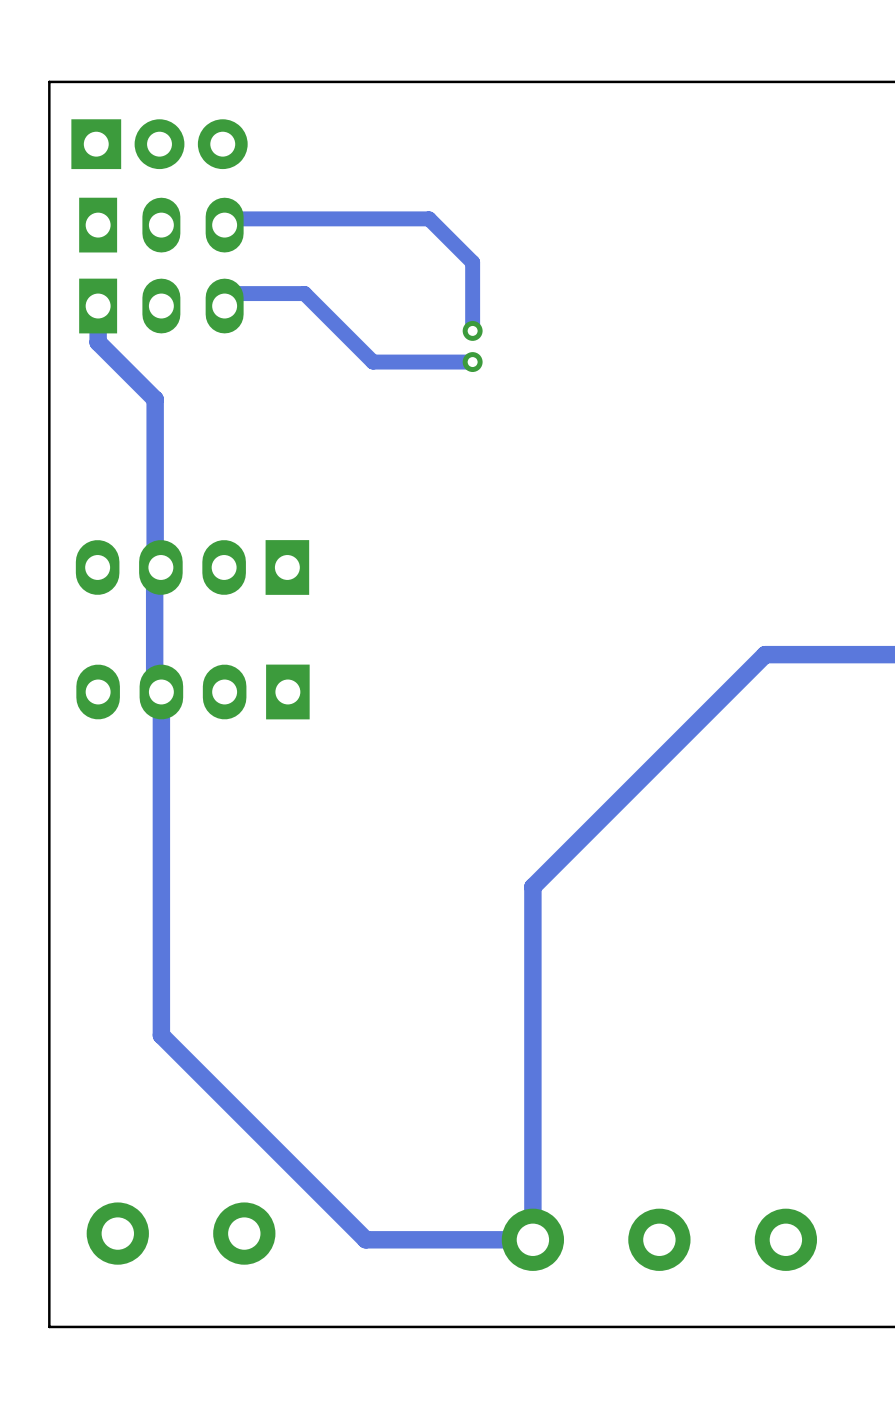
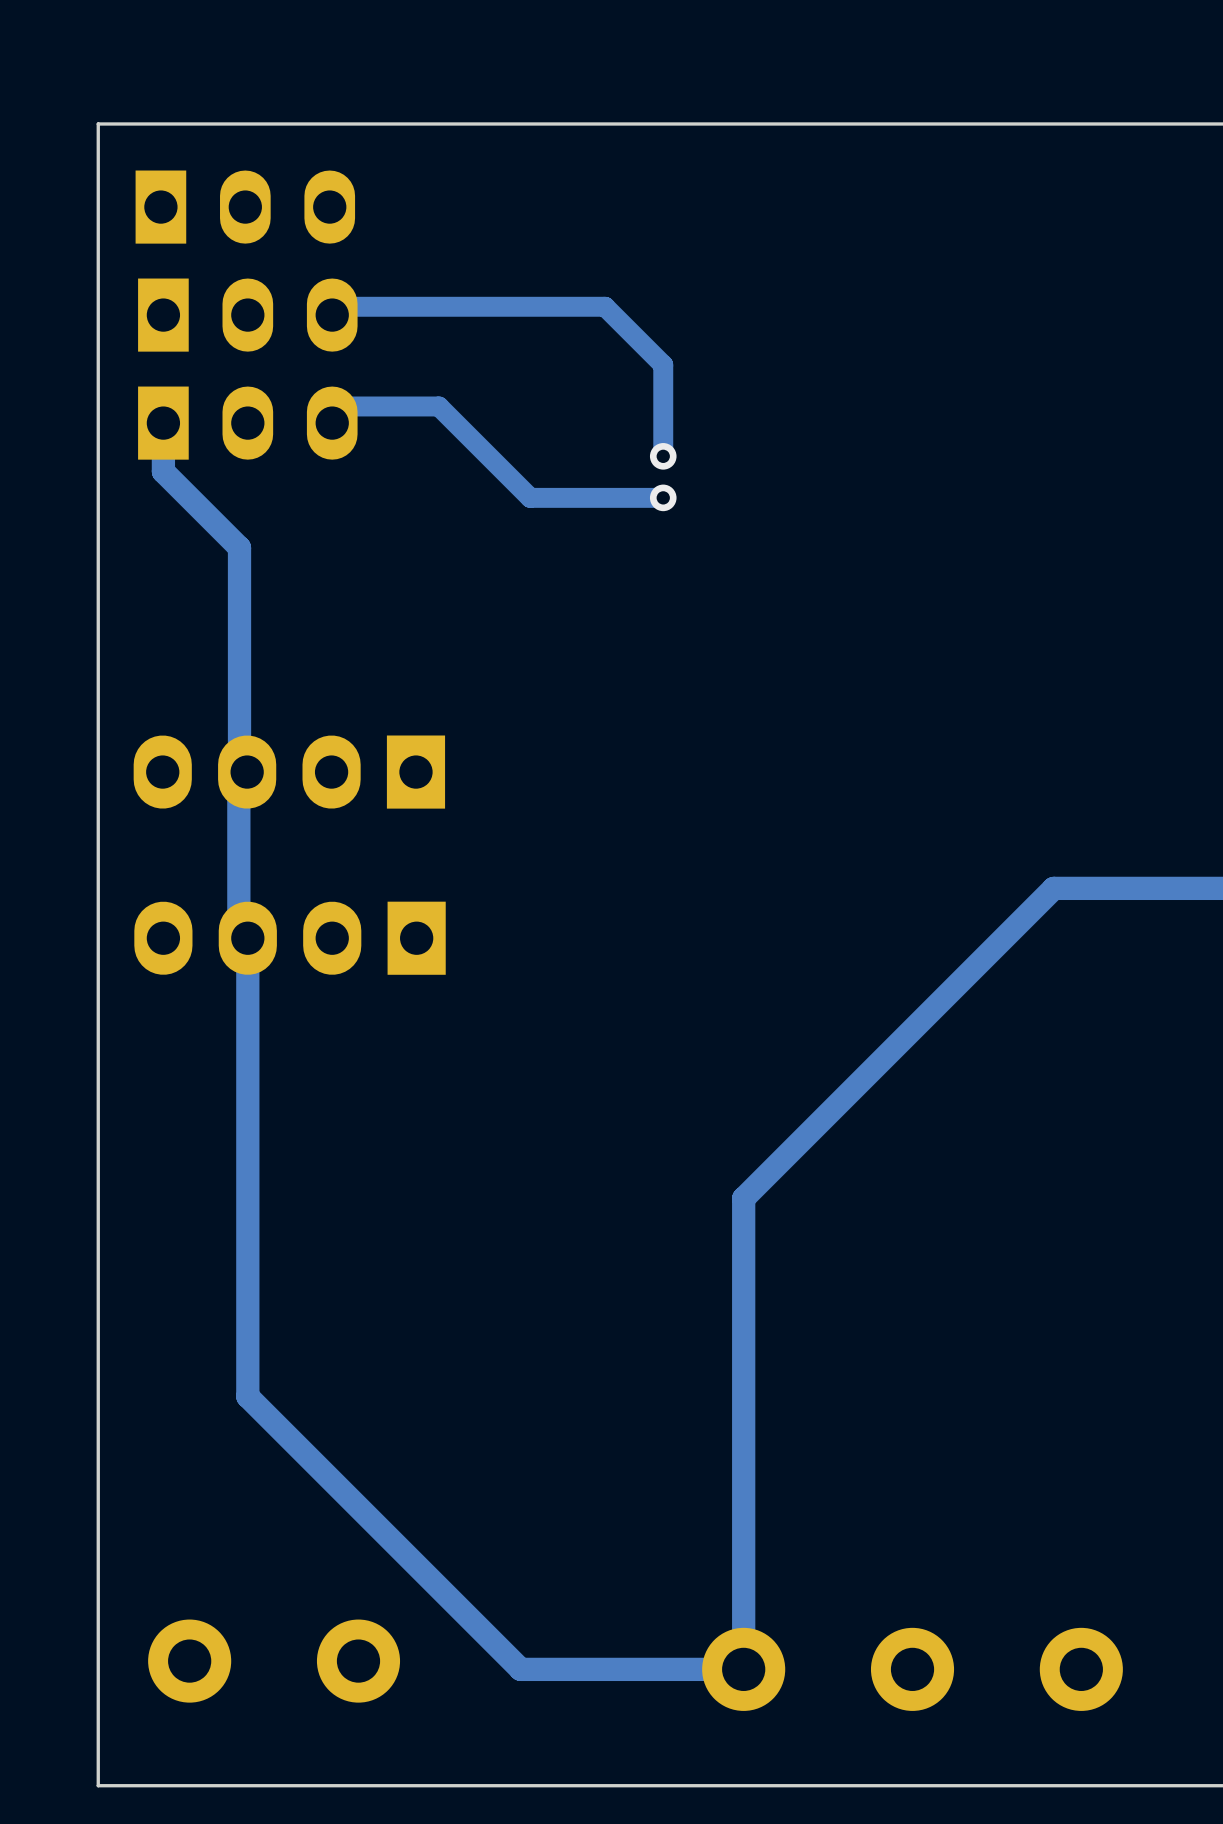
part footprint: [71, 119, 248, 170] -> [135, 170, 356, 244]

